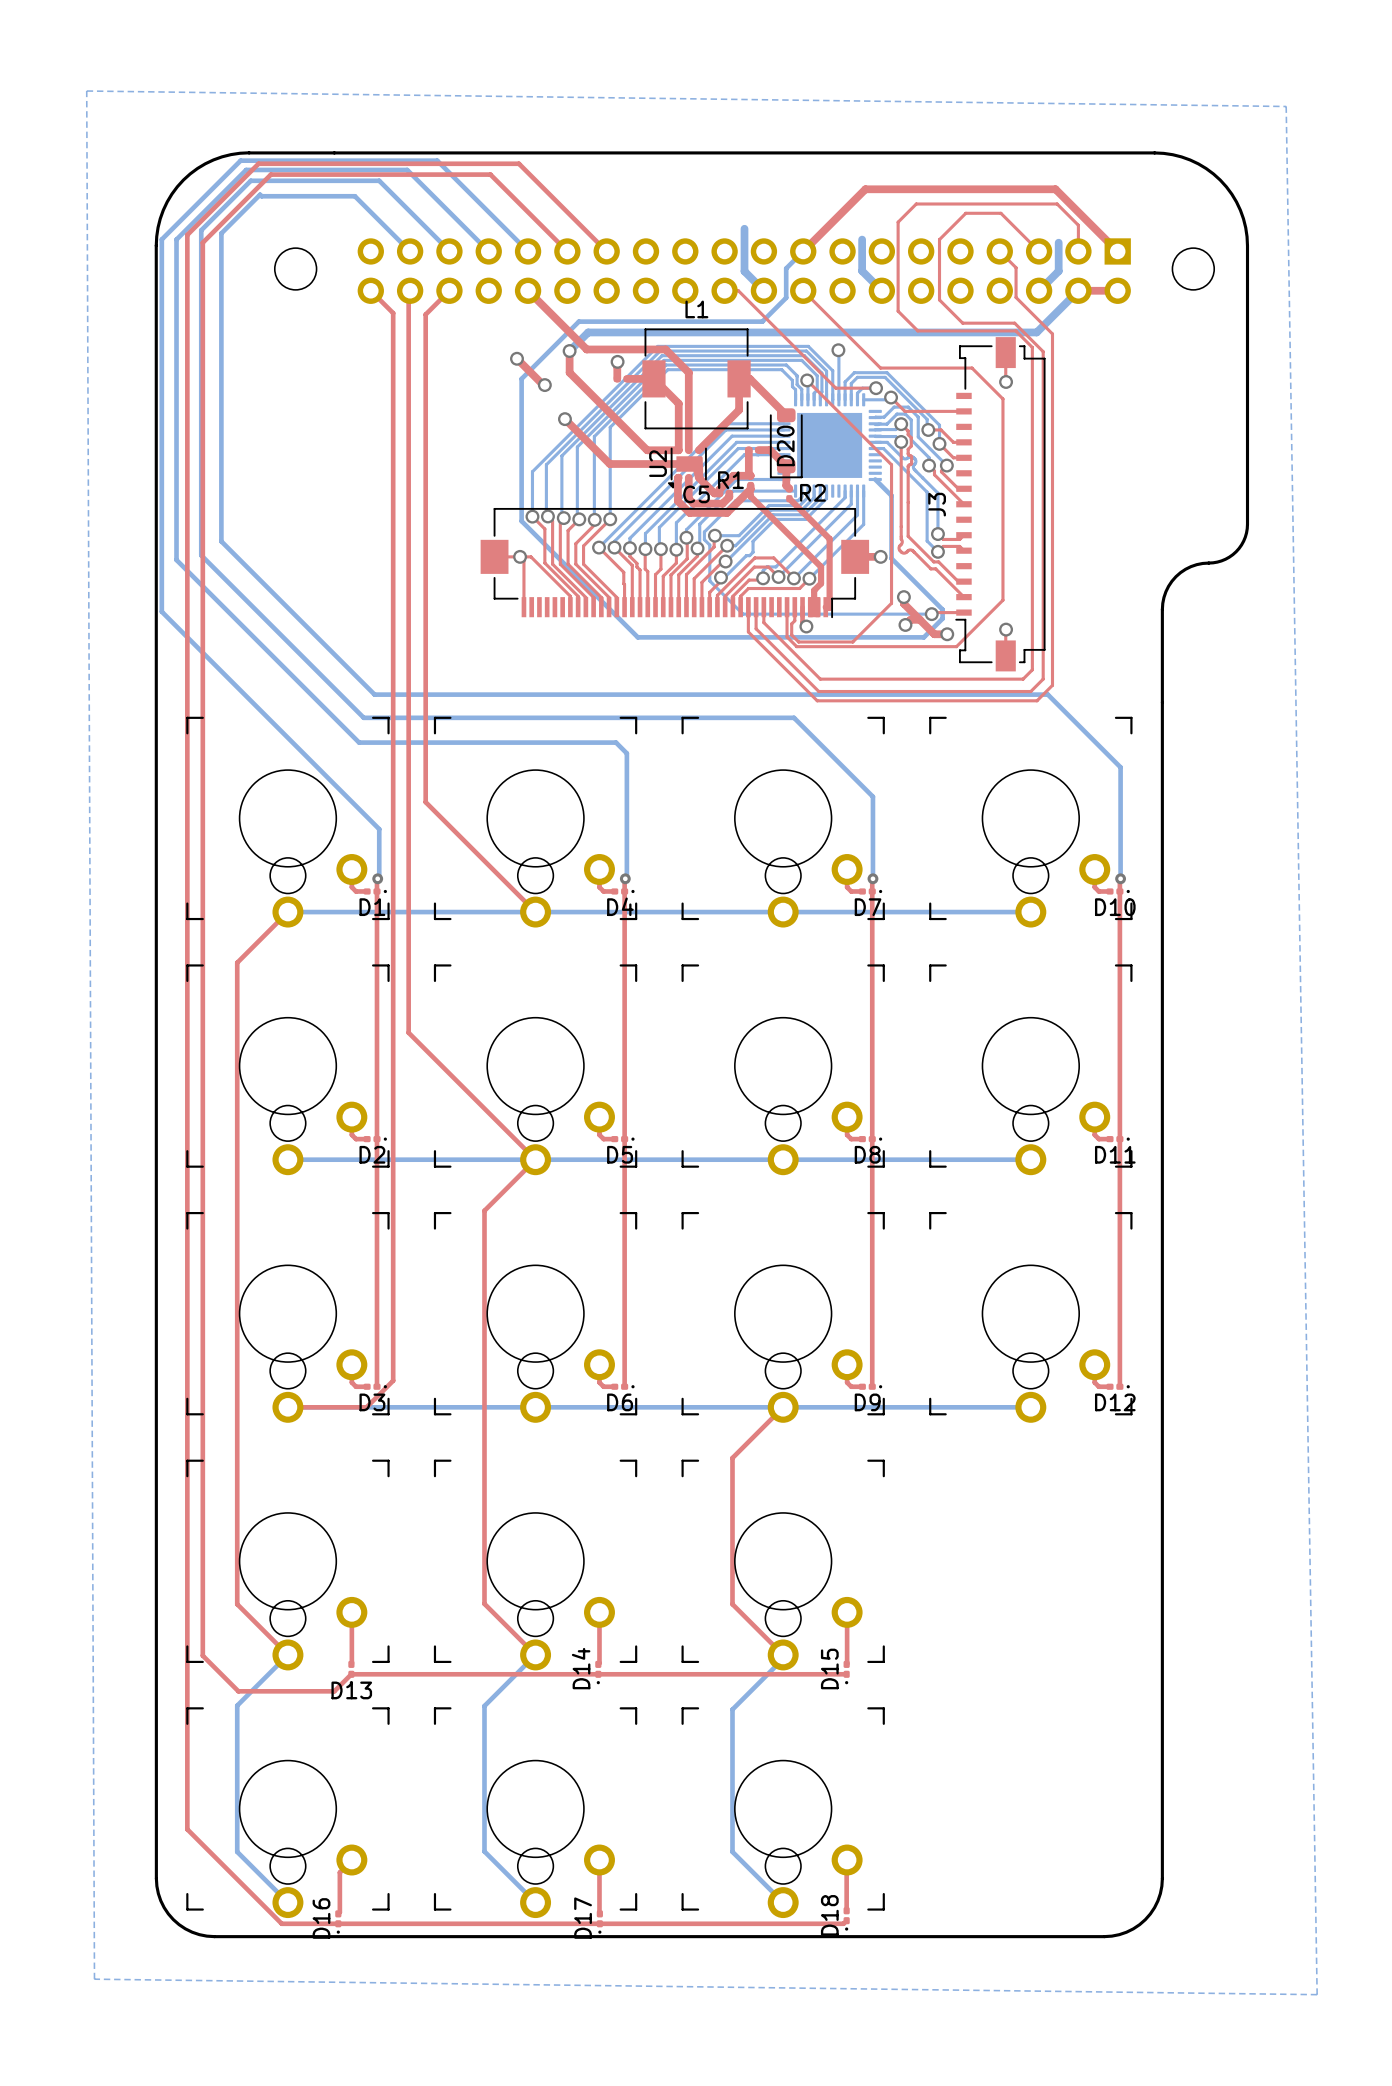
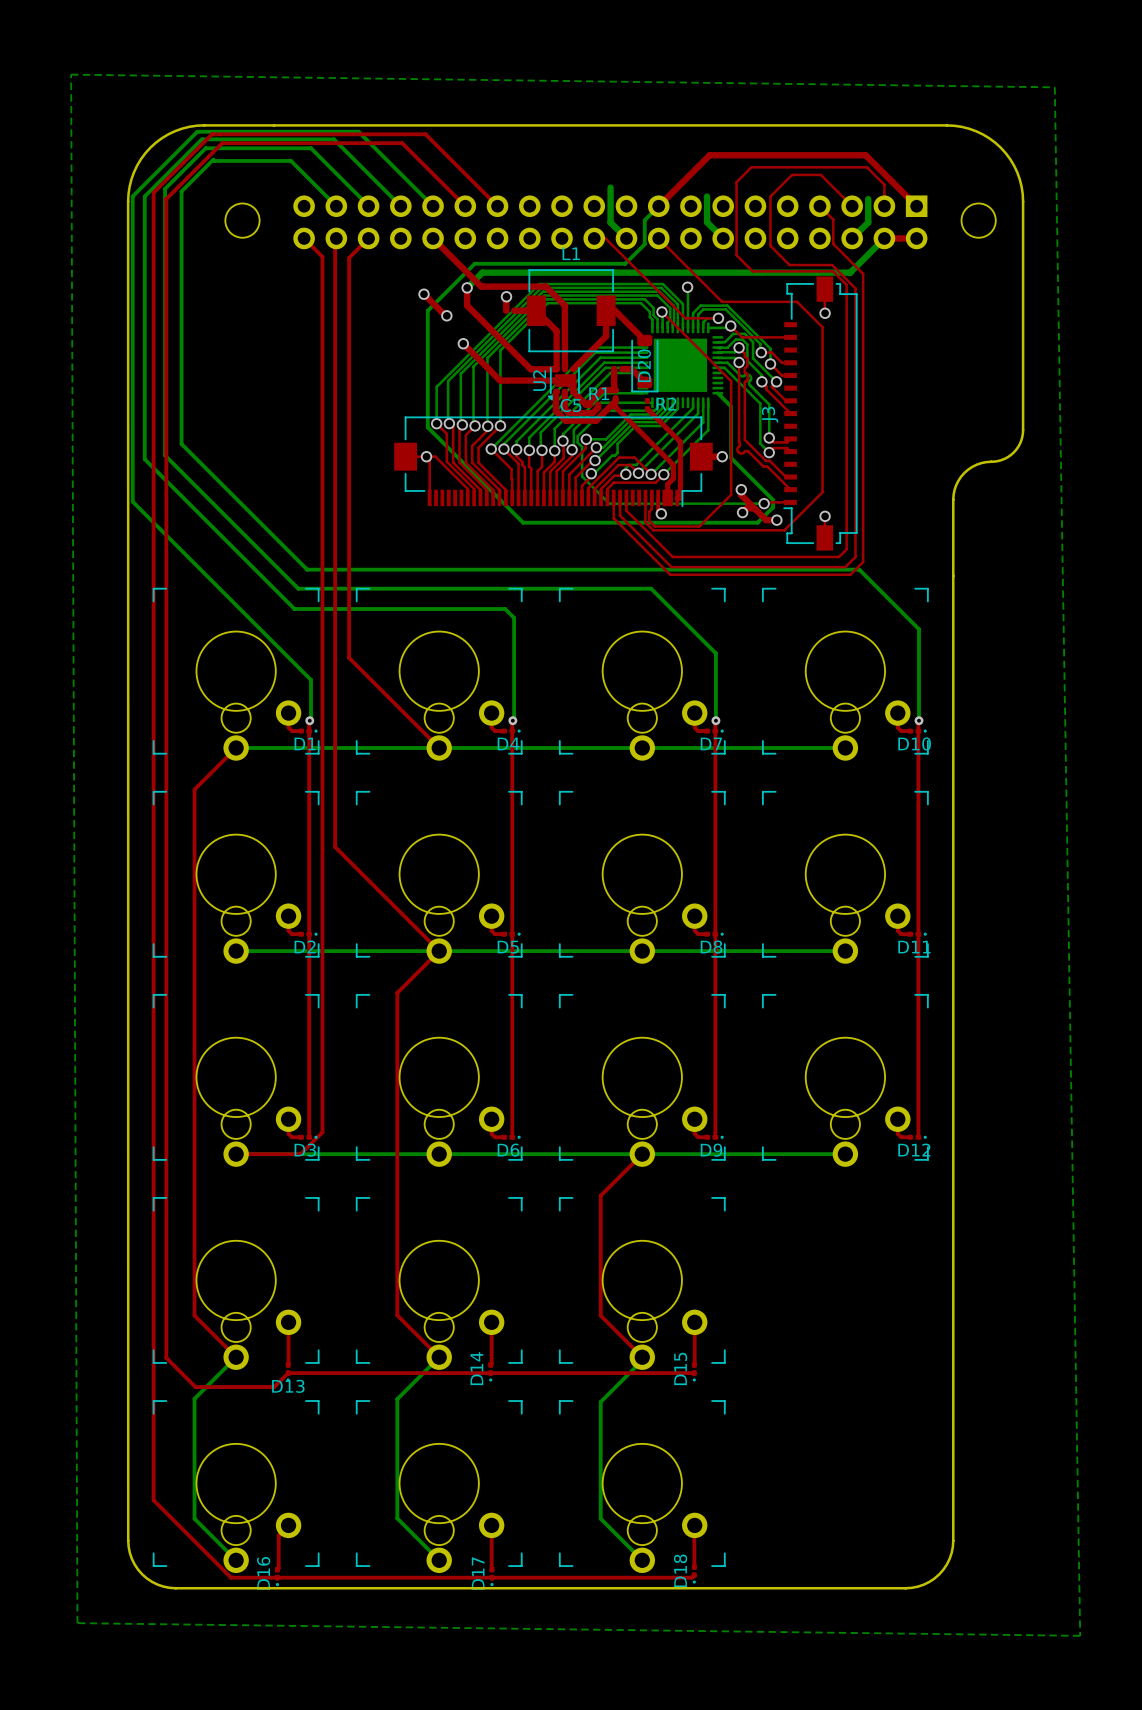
top track: (786, 466) (786, 485) (789, 488) -> none

